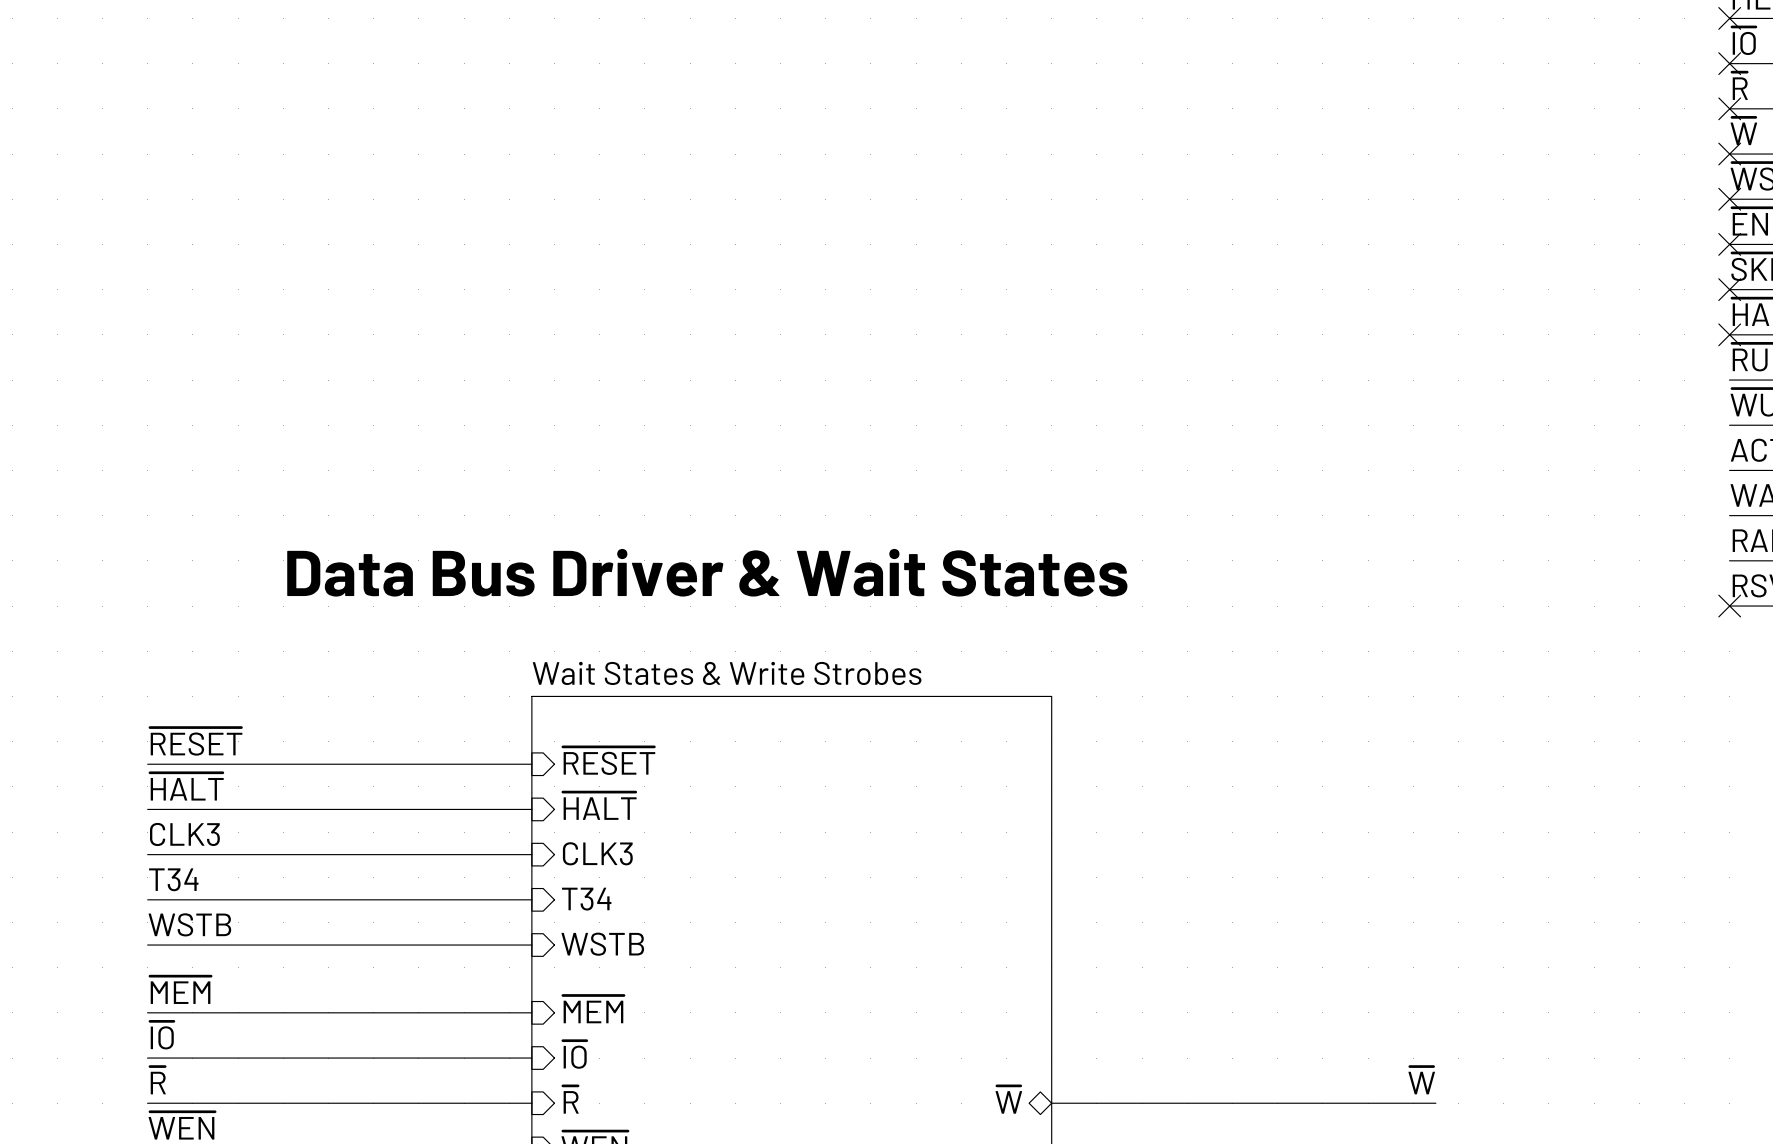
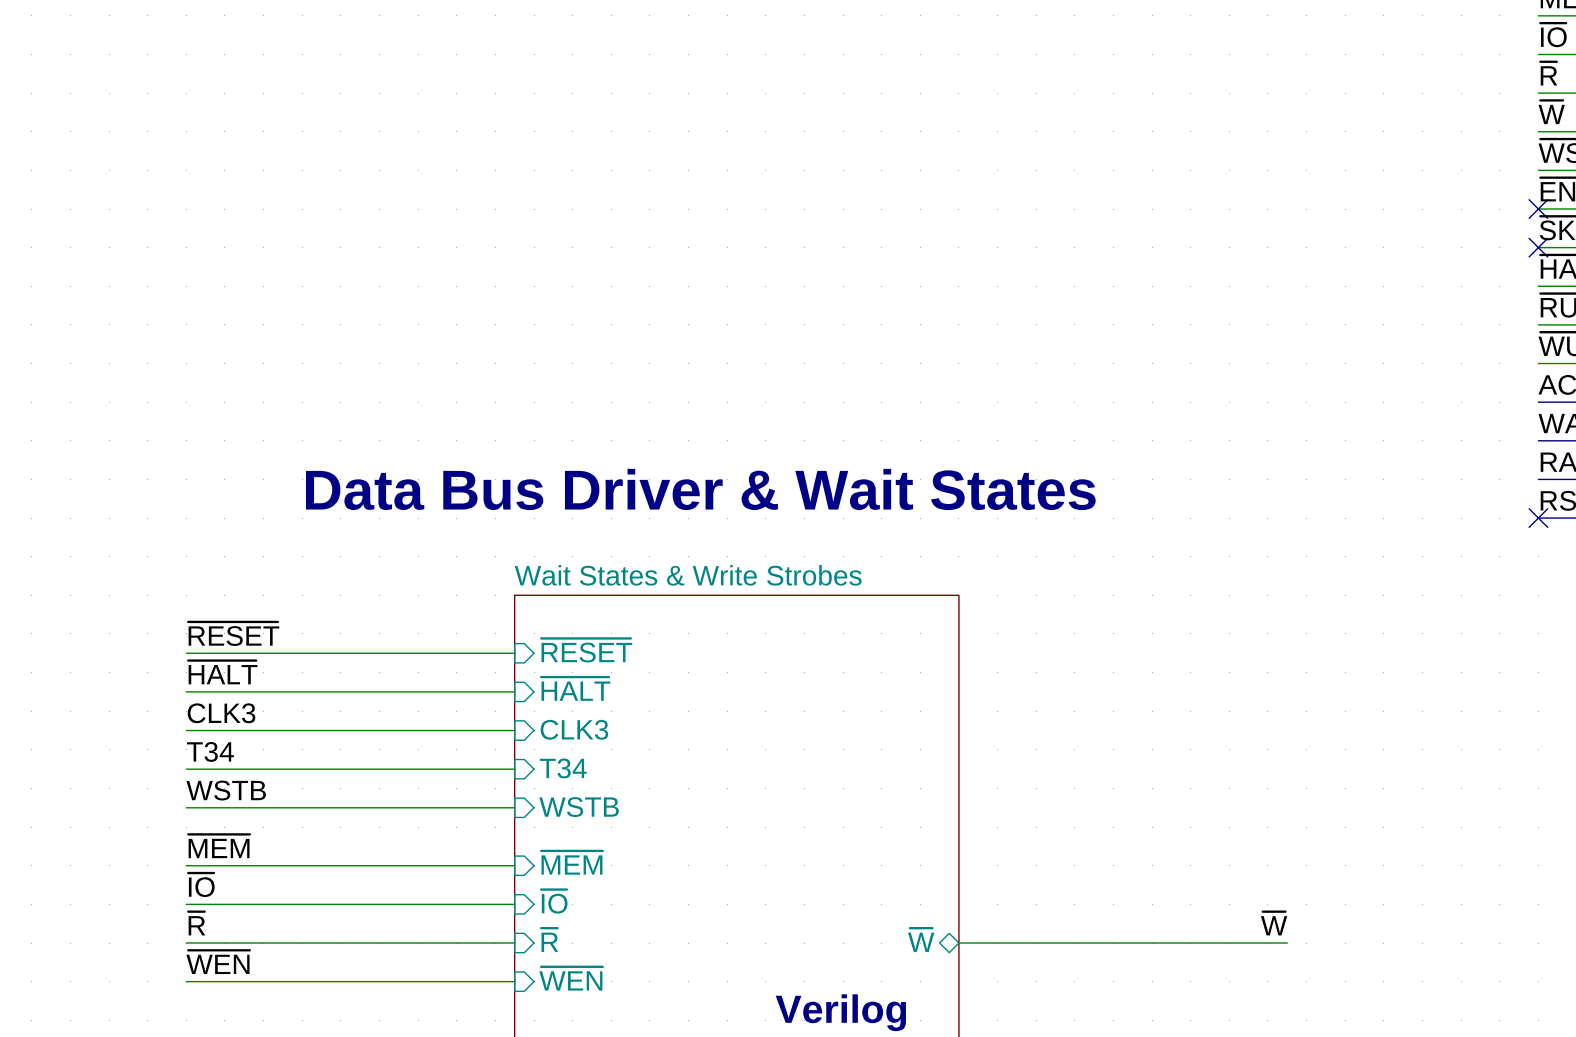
no-connect mark: (1729, 18) -> none
no-connect mark: (1729, 63) -> none
no-connect mark: (1729, 108) -> none
no-connect mark: (1729, 154) -> none
no-connect mark: (1729, 199) -> none
no-connect mark: (1729, 334) -> none

